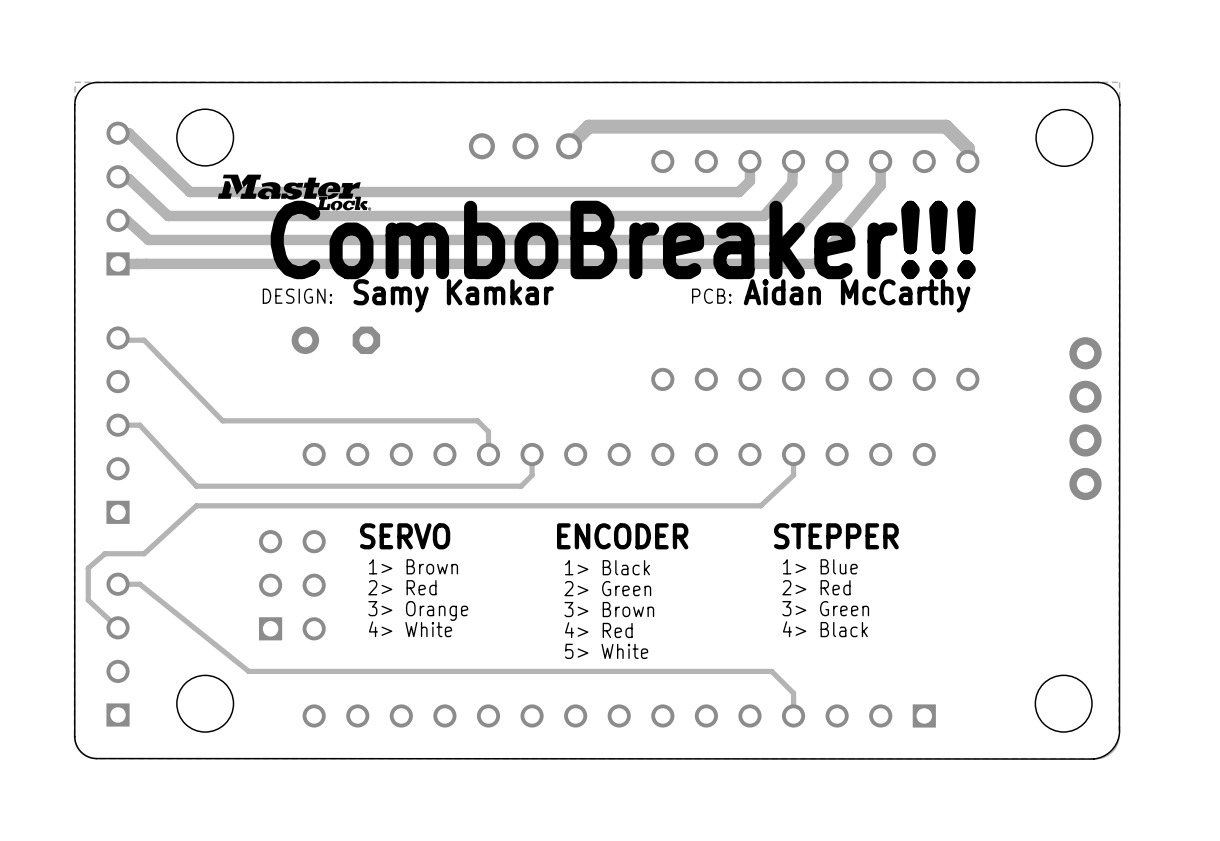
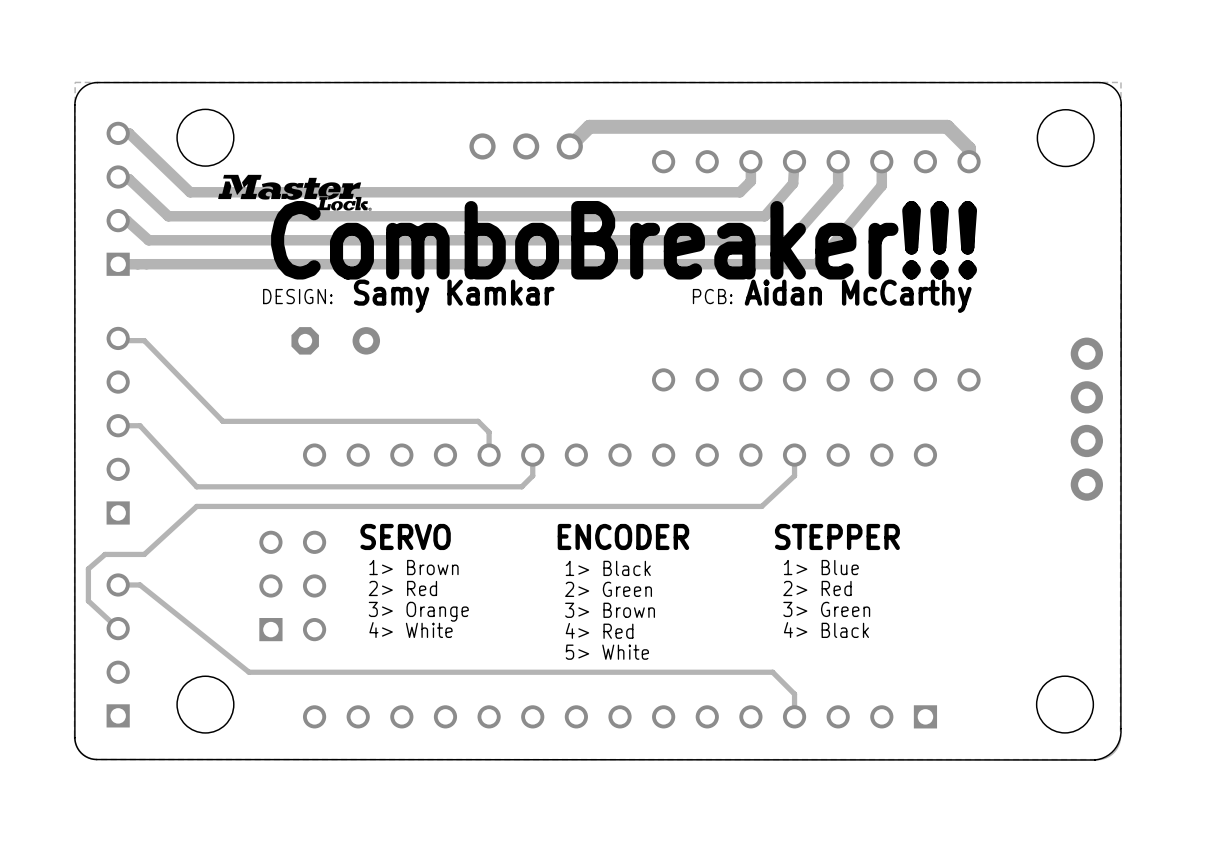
part rotation: 0° (335, 340) -> 180° (335, 340)

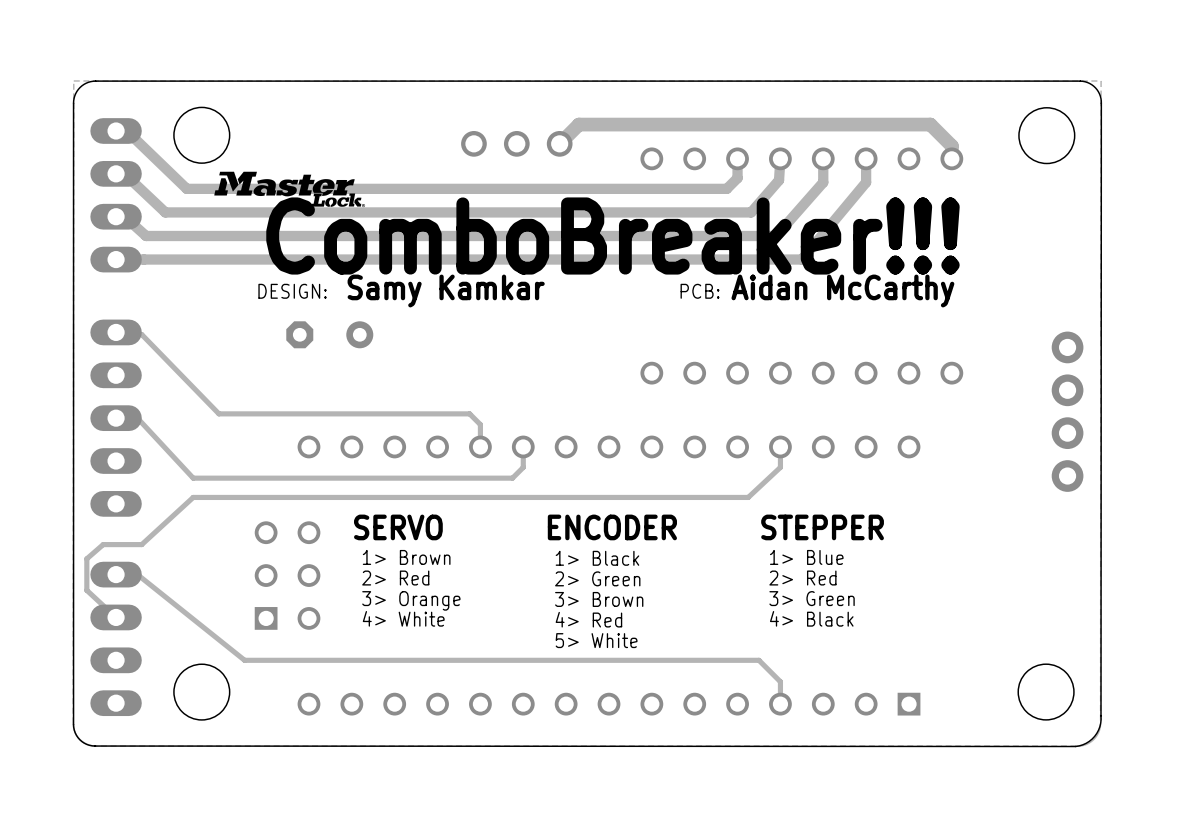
part footprint: [106, 121, 130, 276] -> [90, 118, 142, 273]
part footprint: [106, 326, 130, 525] -> [90, 319, 142, 517]
part footprint: [106, 573, 130, 728] -> [90, 561, 142, 717]

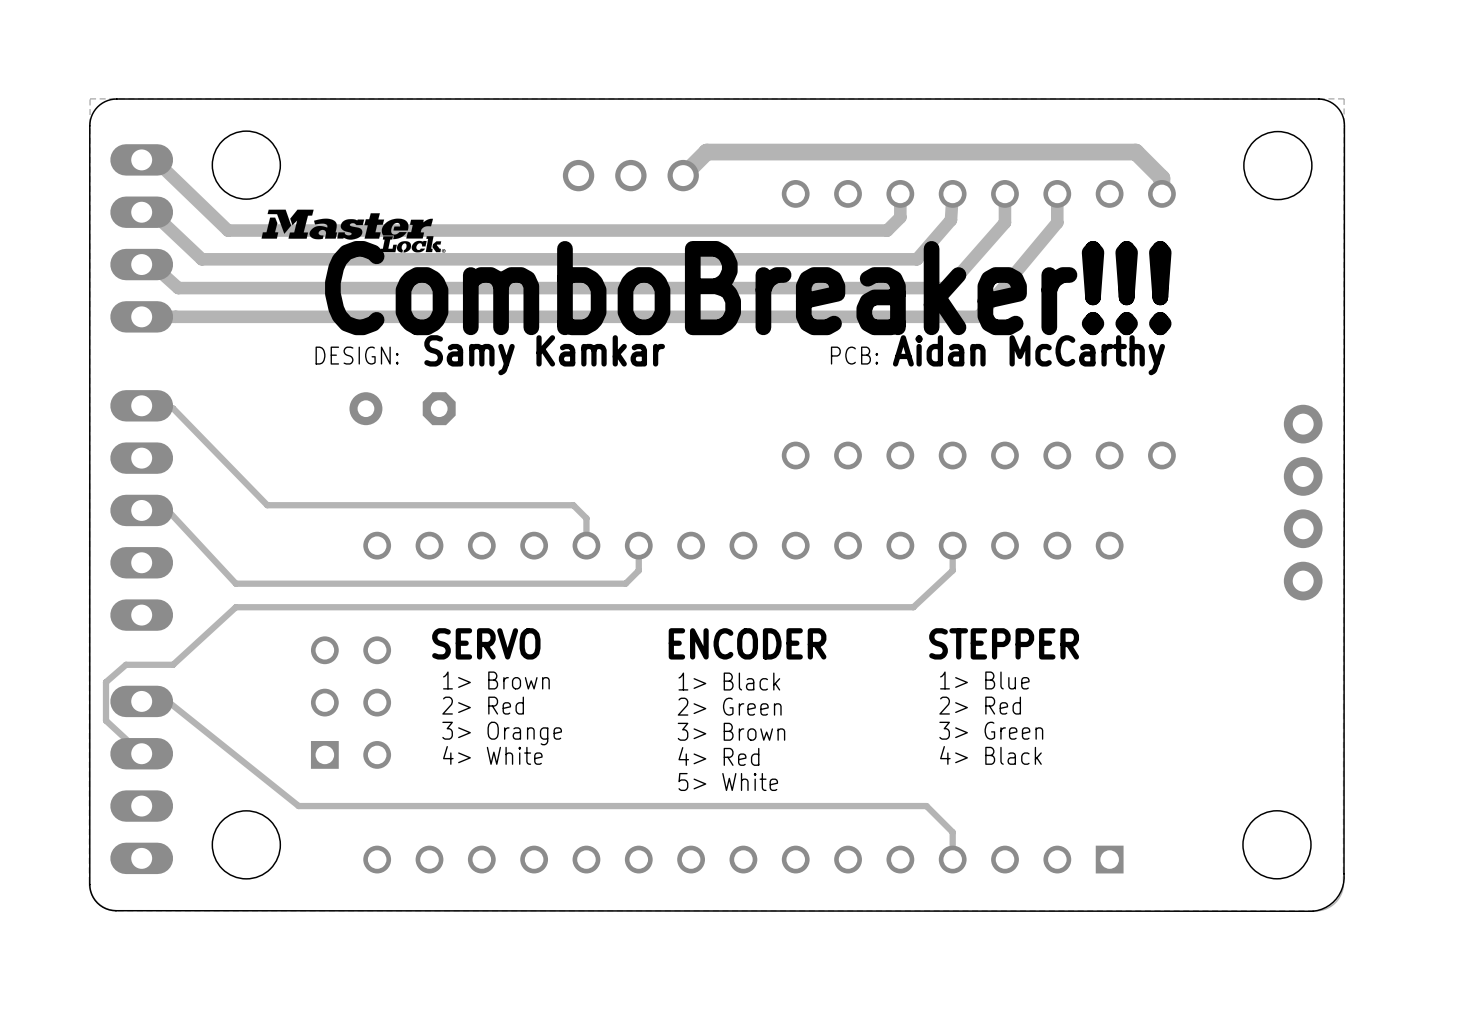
part rotation: 0° (329, 334) -> 180° (402, 408)

